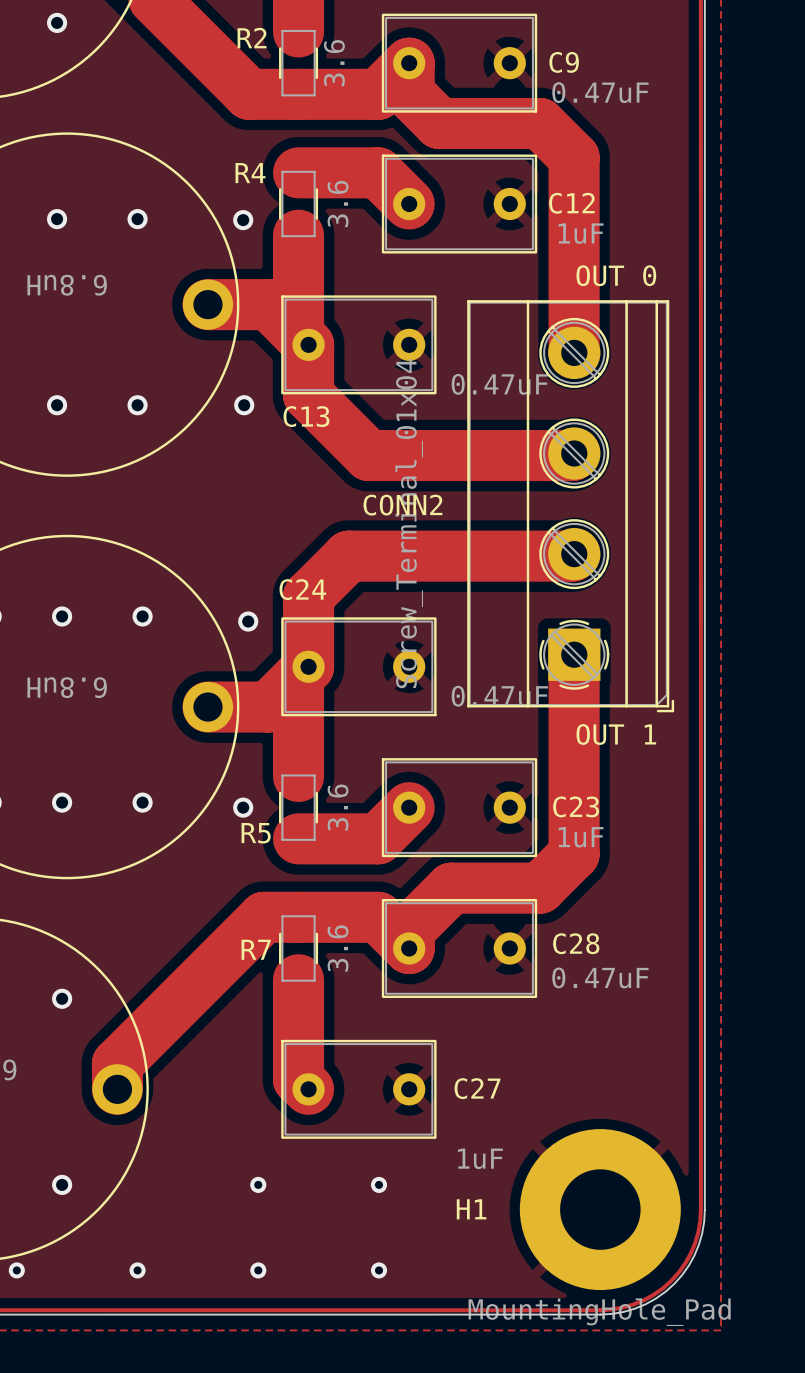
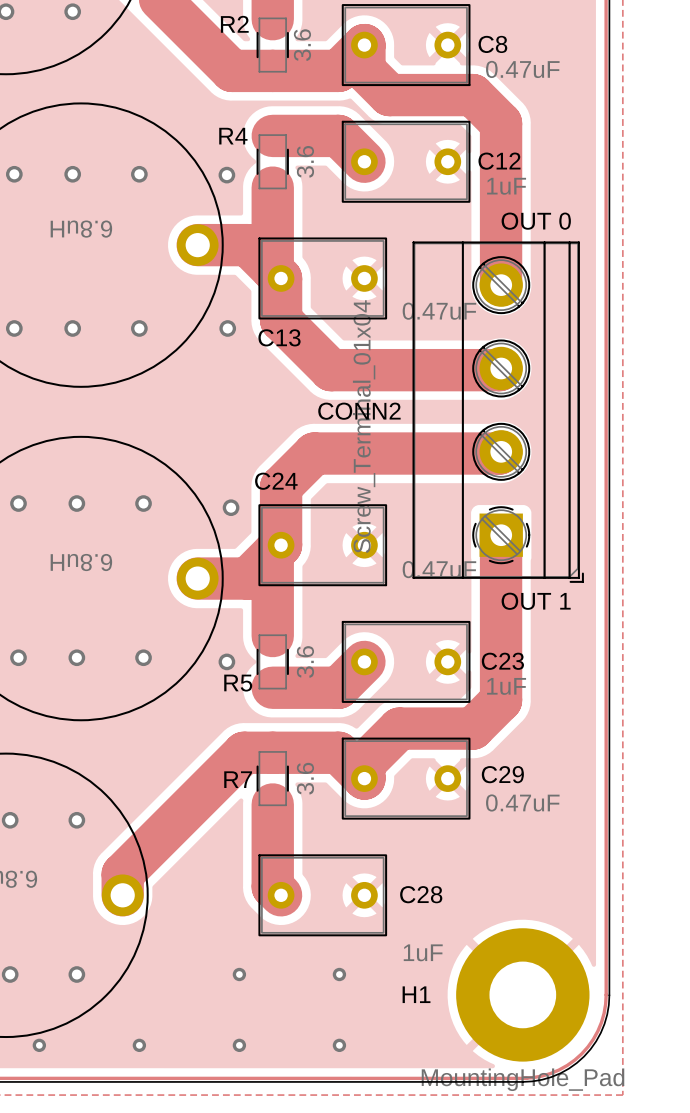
C9 name: C9 (564, 62) -> C8 (492, 44)
C28 name: C28 (576, 943) -> C29 (502, 774)
C27 name: C27 (477, 1088) -> C28 (421, 894)

